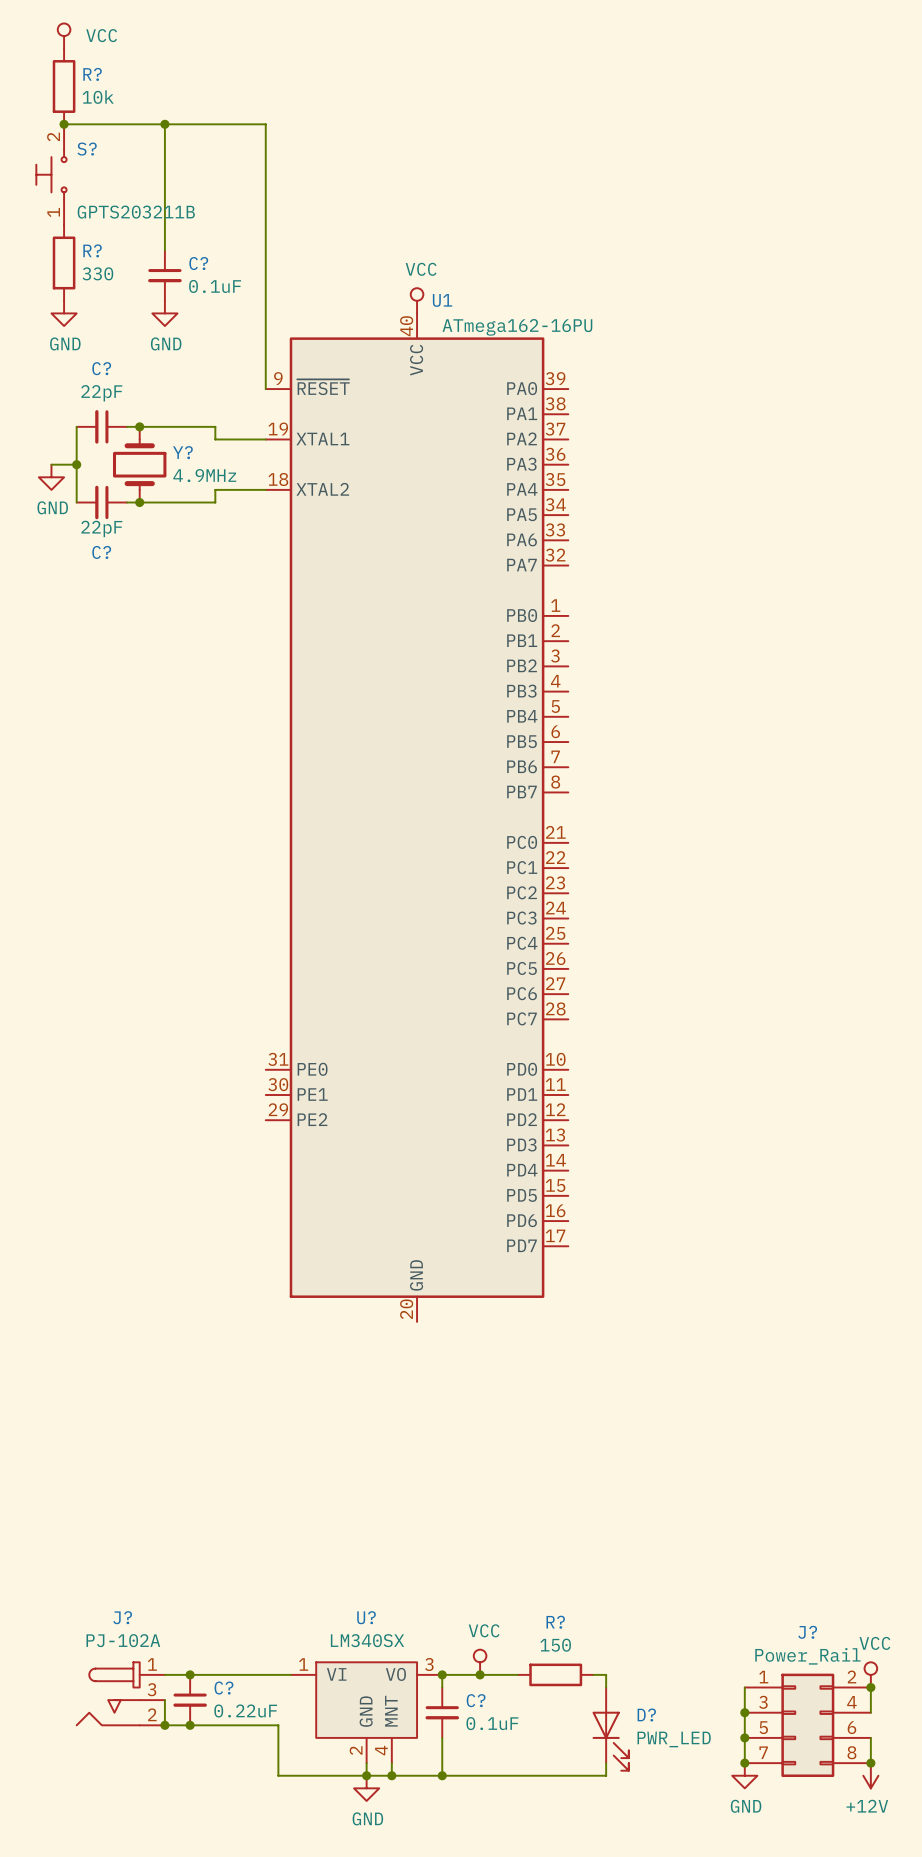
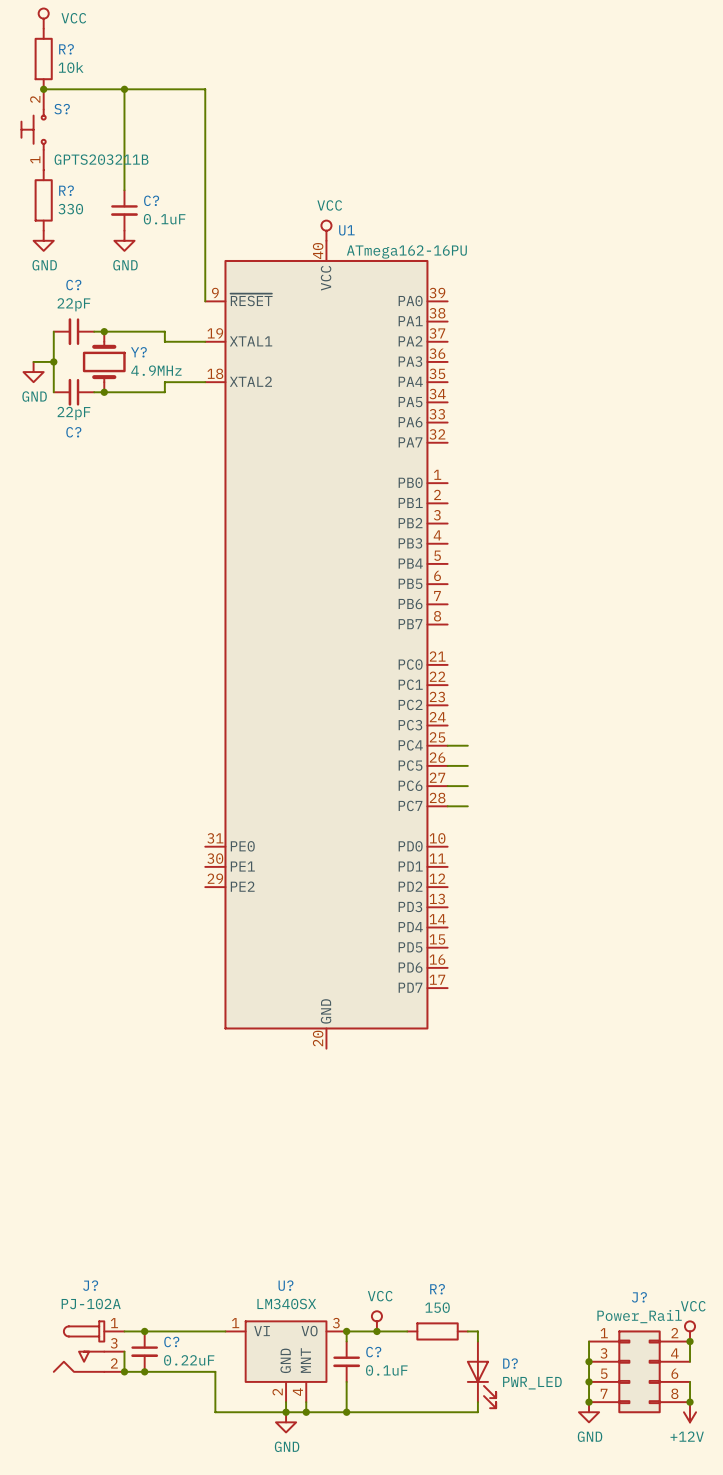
wire: none -> (447, 745) (467, 745)
wire: none -> (447, 765) (467, 765)
wire: none -> (447, 786) (467, 786)
wire: none -> (447, 806) (467, 806)

